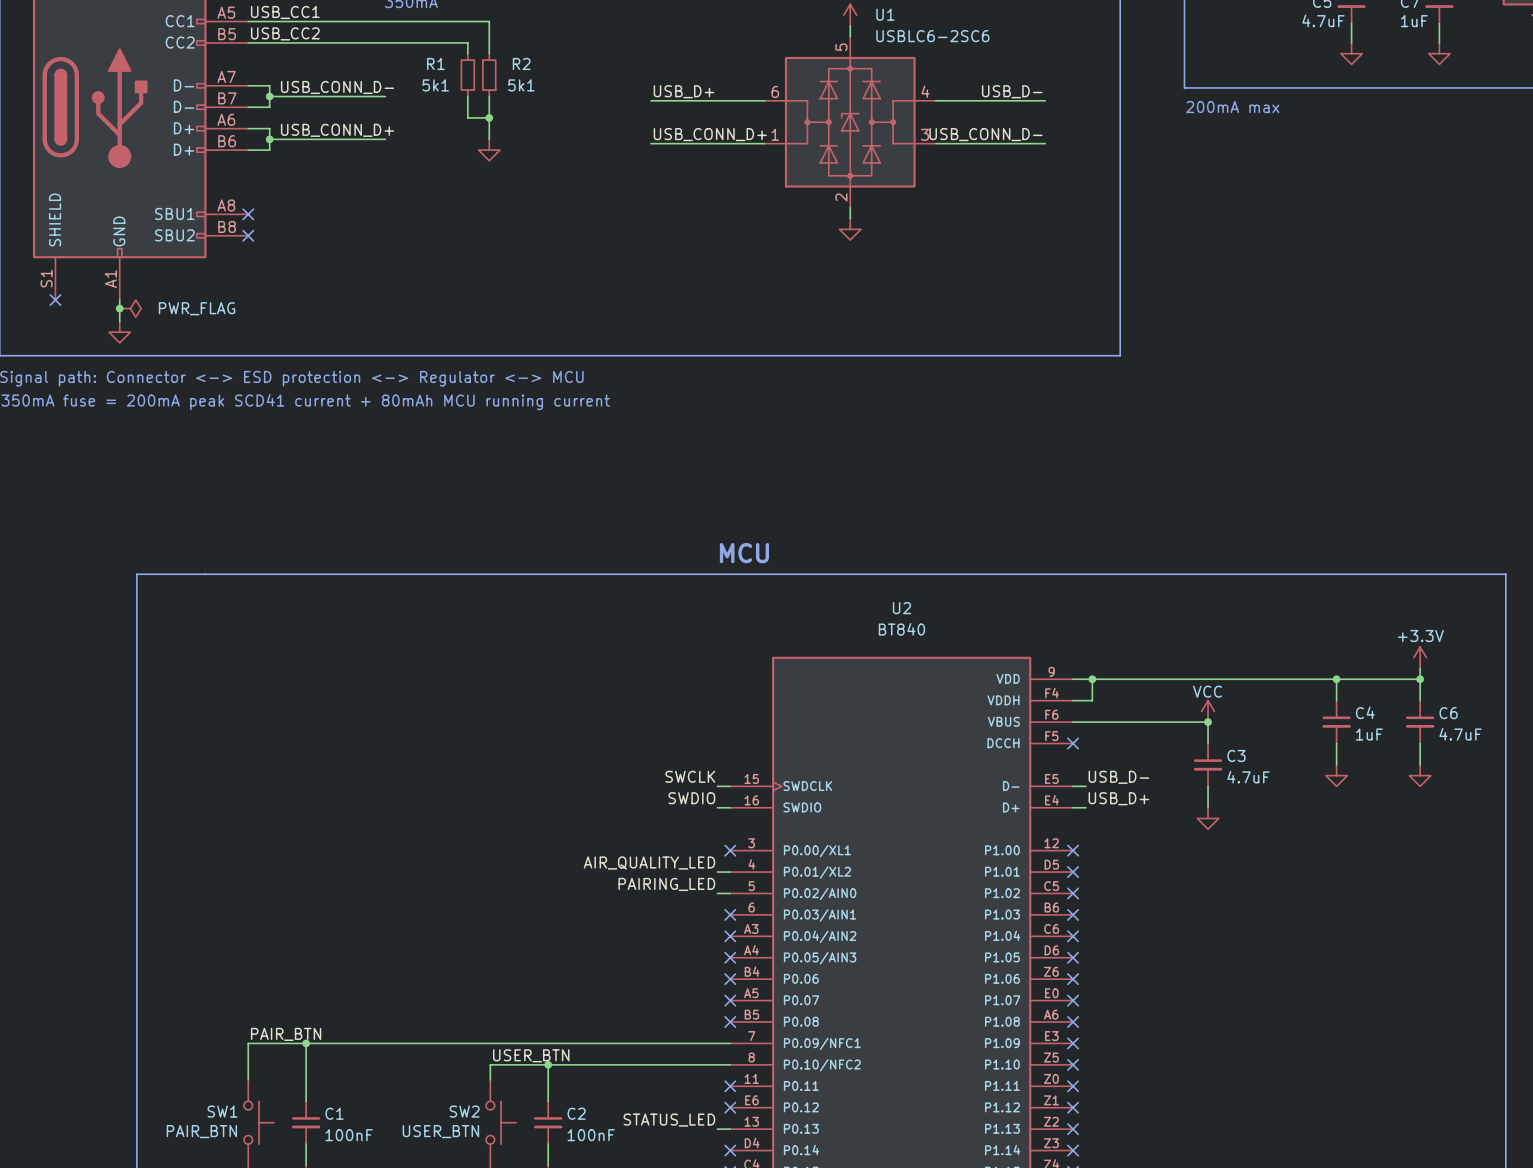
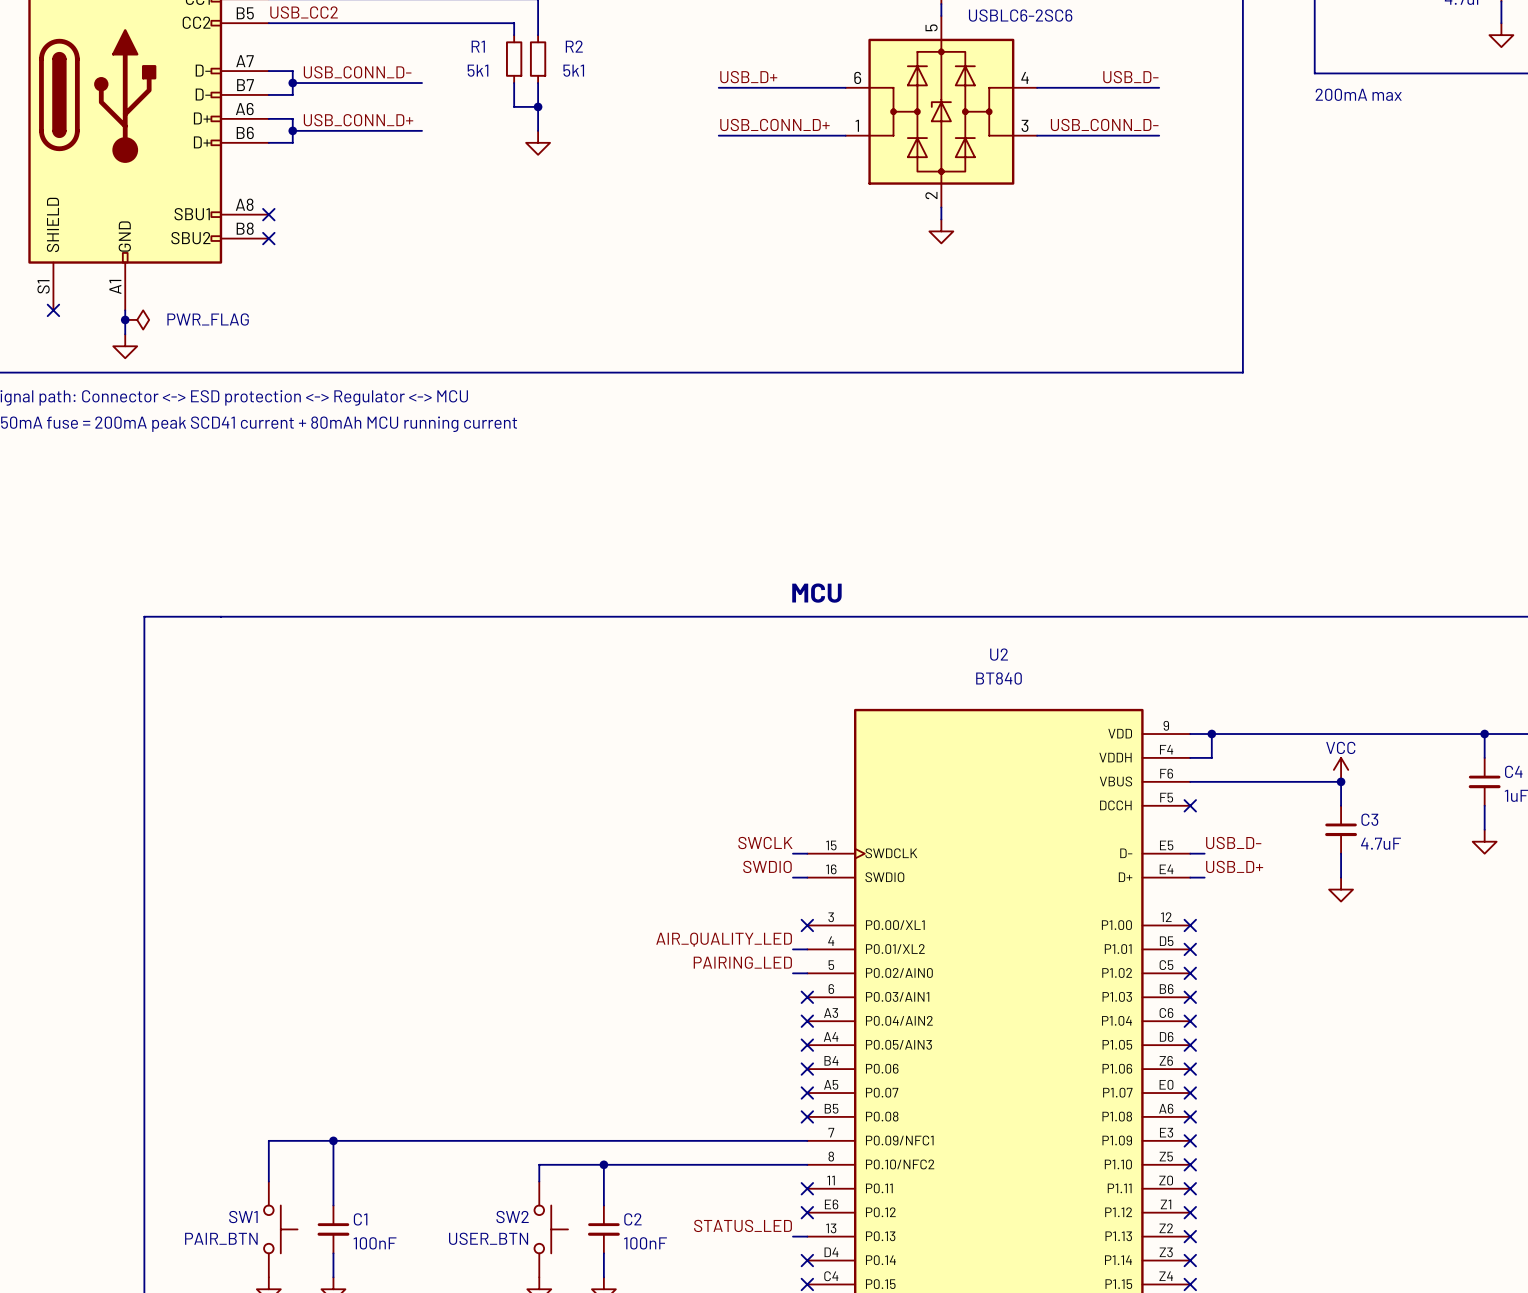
label: PAIR_BTN (286, 1034) -> none
label: USER_BTN (531, 1055) -> none

